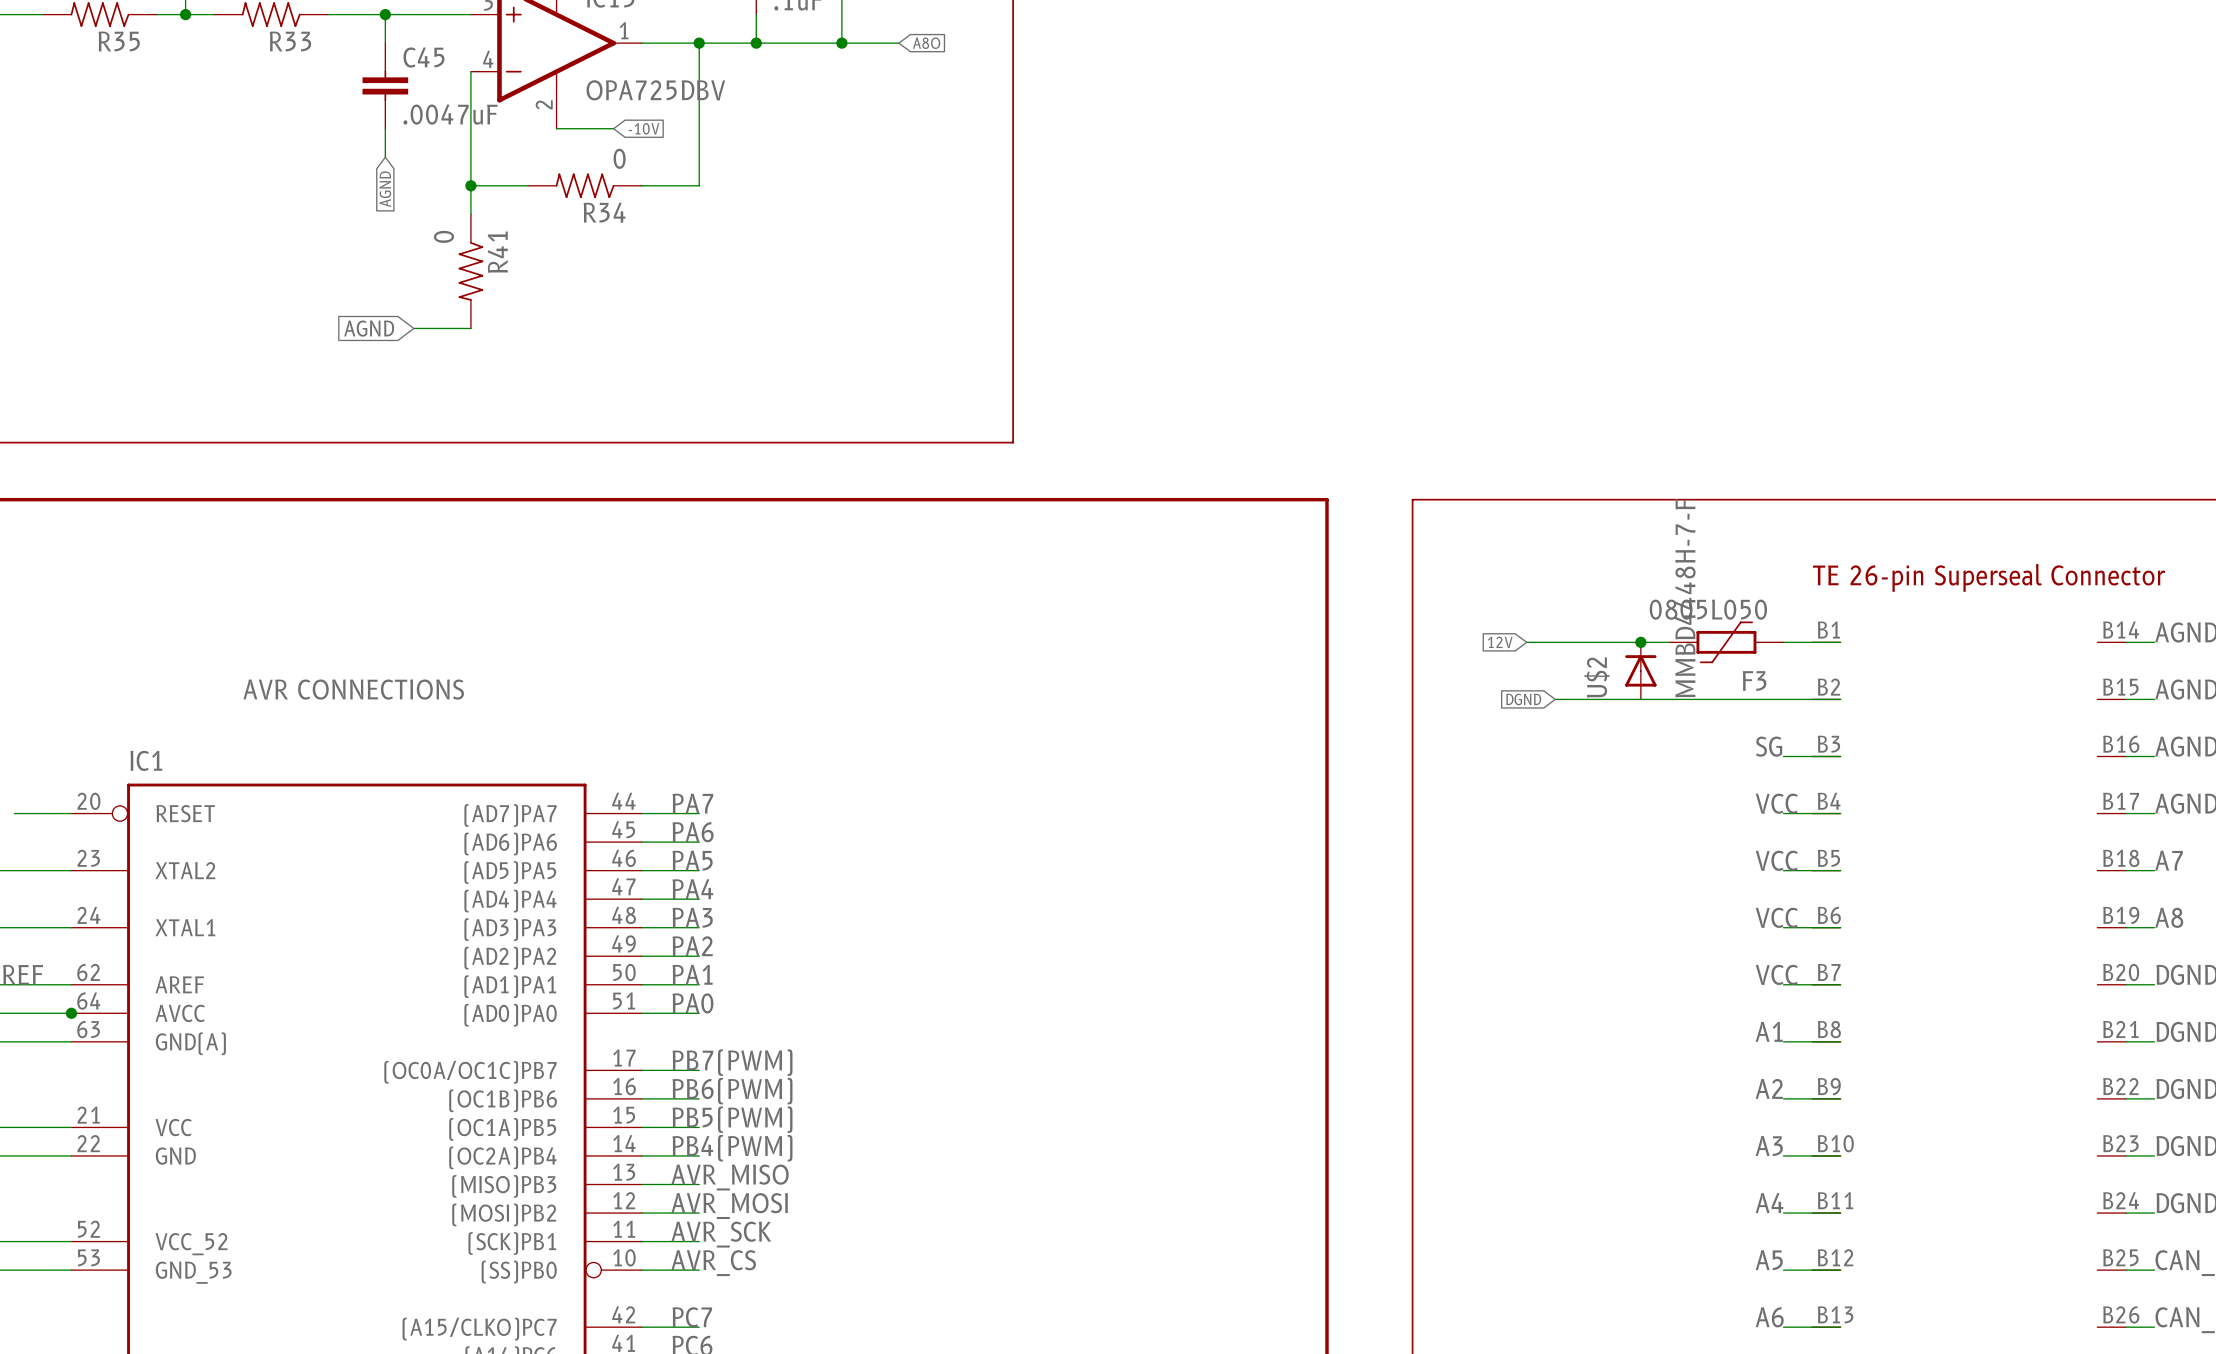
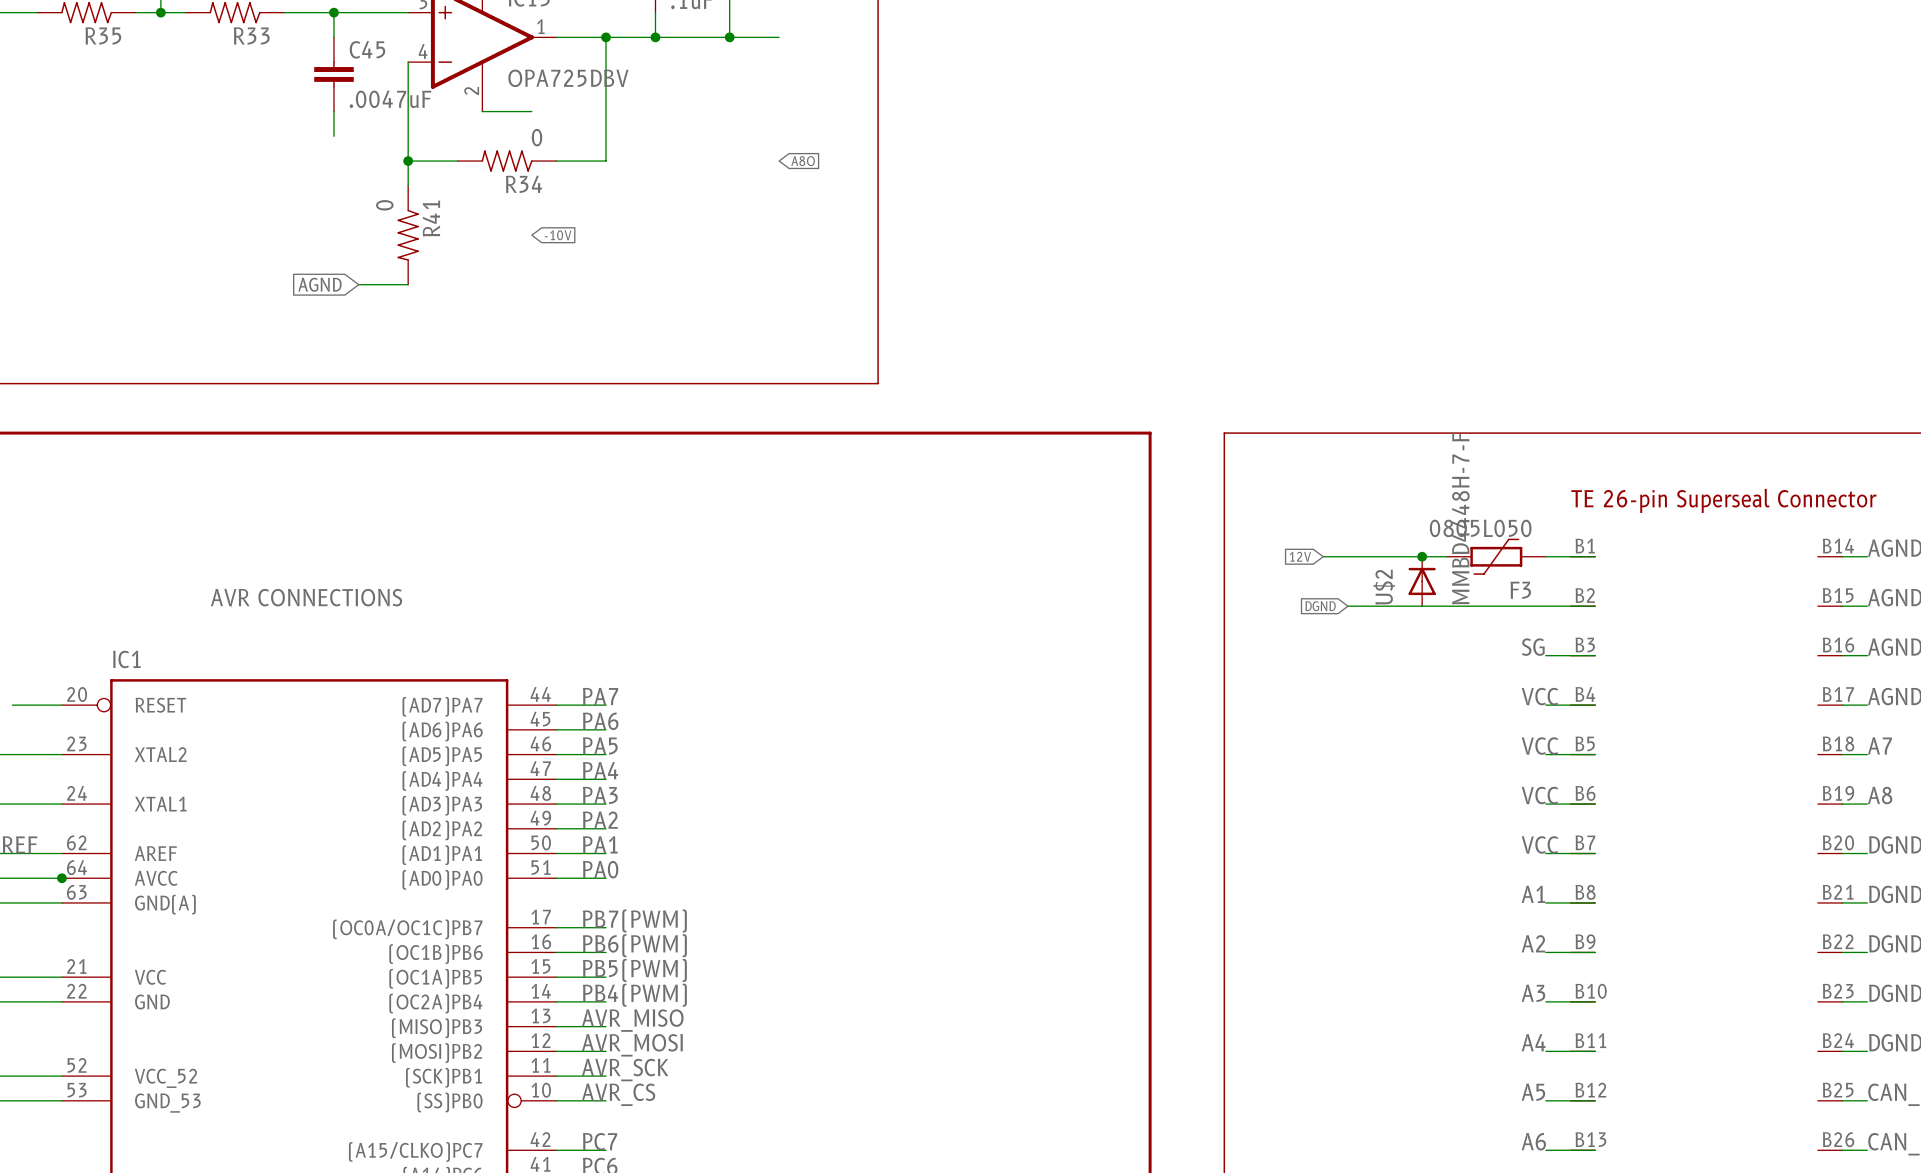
global label position: A8O (926, 43) -> A8O (803, 161)
global label position: -10V (644, 128) -> -10V (558, 235)
global label: AGND (385, 189) -> none

